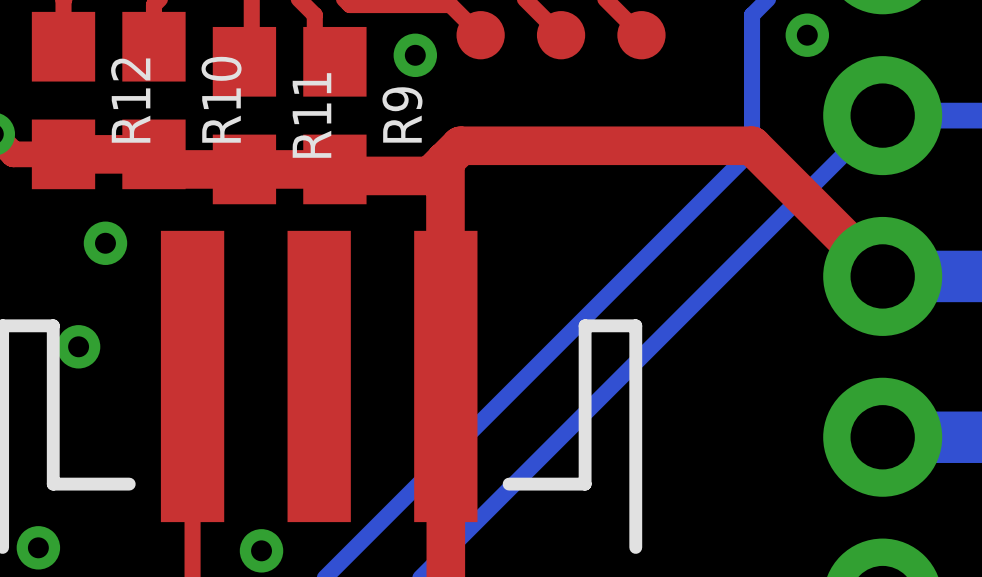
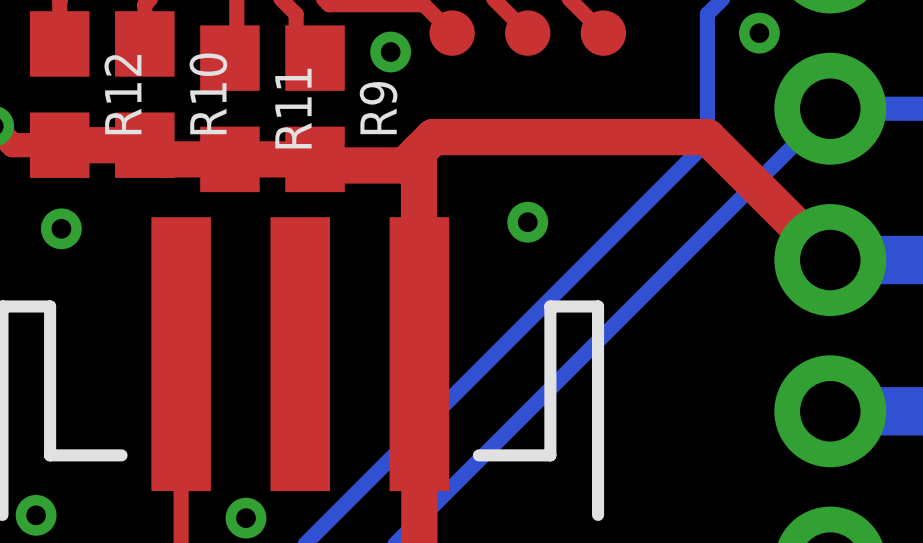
via: none -> (527, 222)
via position: (105, 243) -> (61, 228)
via: (78, 346) -> none

